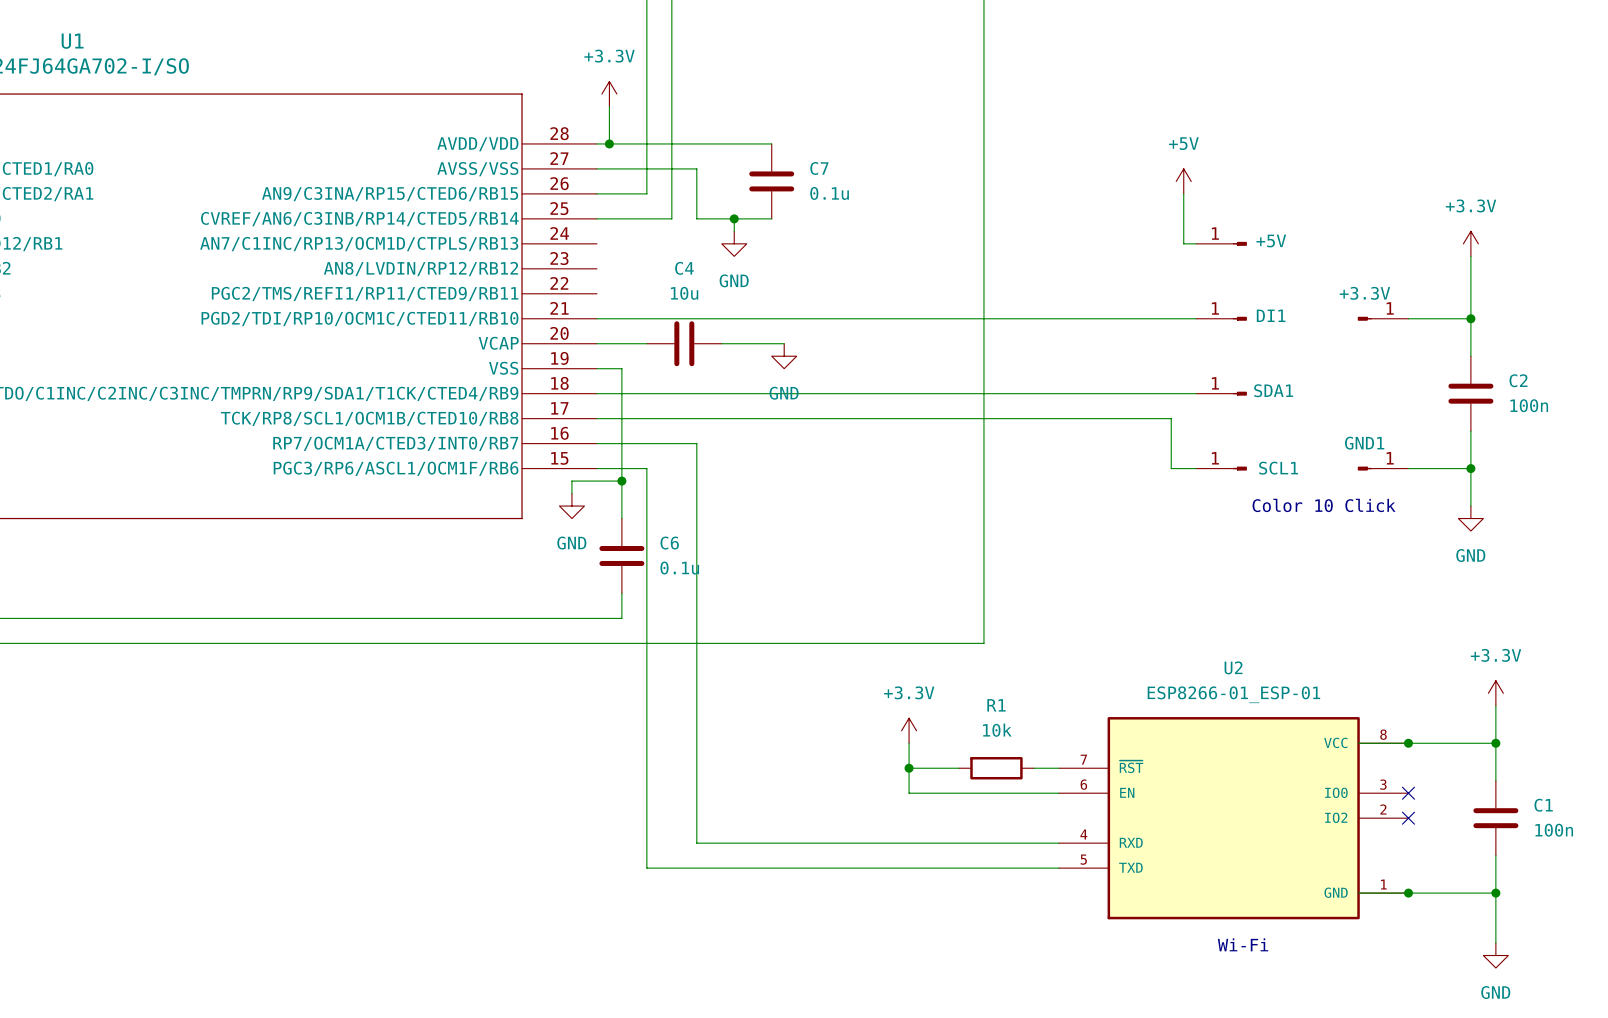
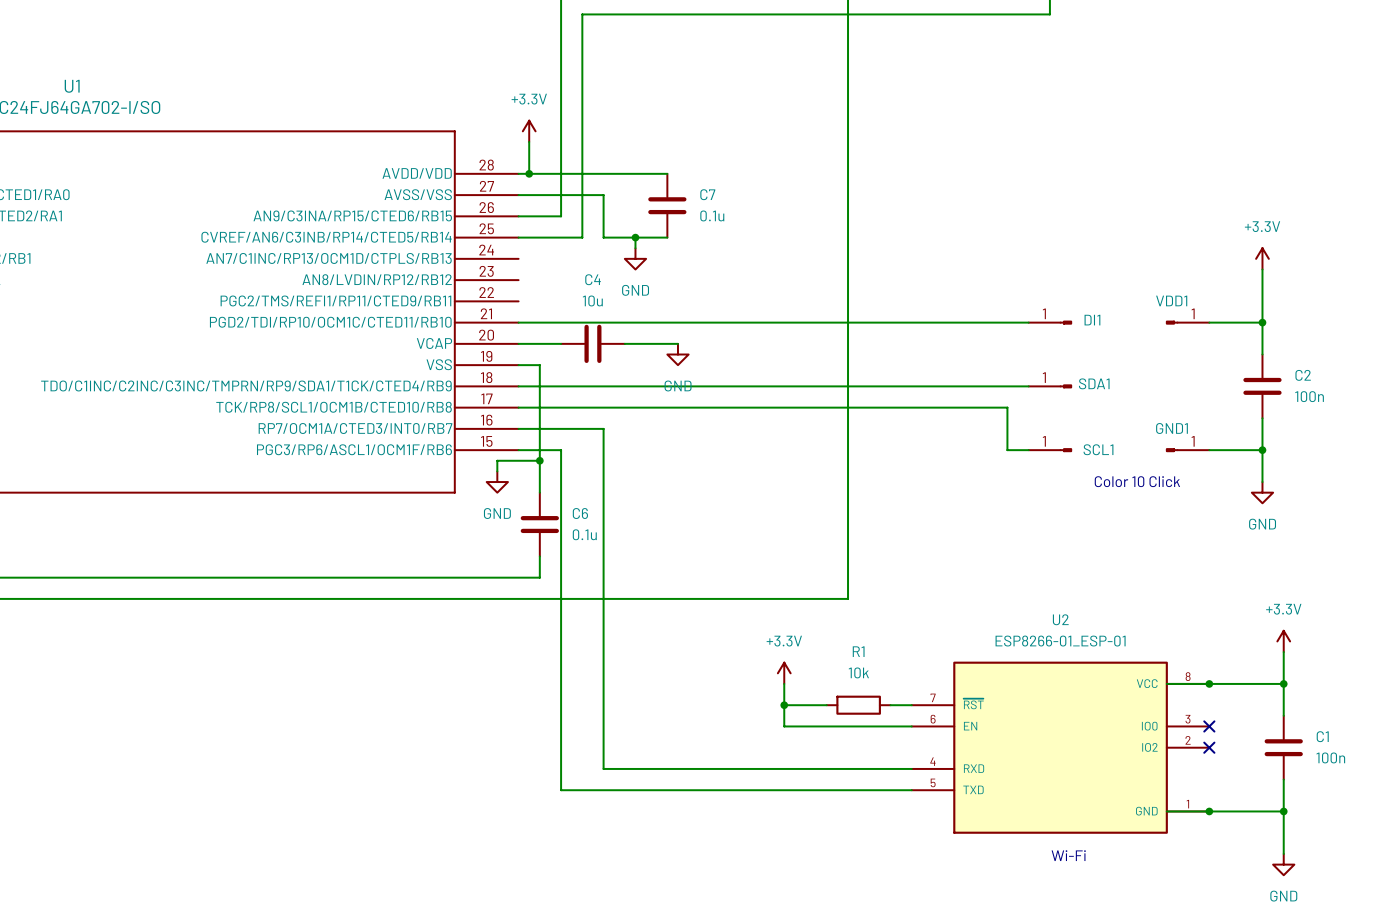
power symbol: +5V (1183, 181) -> none
wire: (1183, 193) (1183, 243) (1196, 243) -> none
+5V: (1221, 243) -> none
+3.3V name: +3.3V (1364, 293) -> VDD1 (1171, 300)

